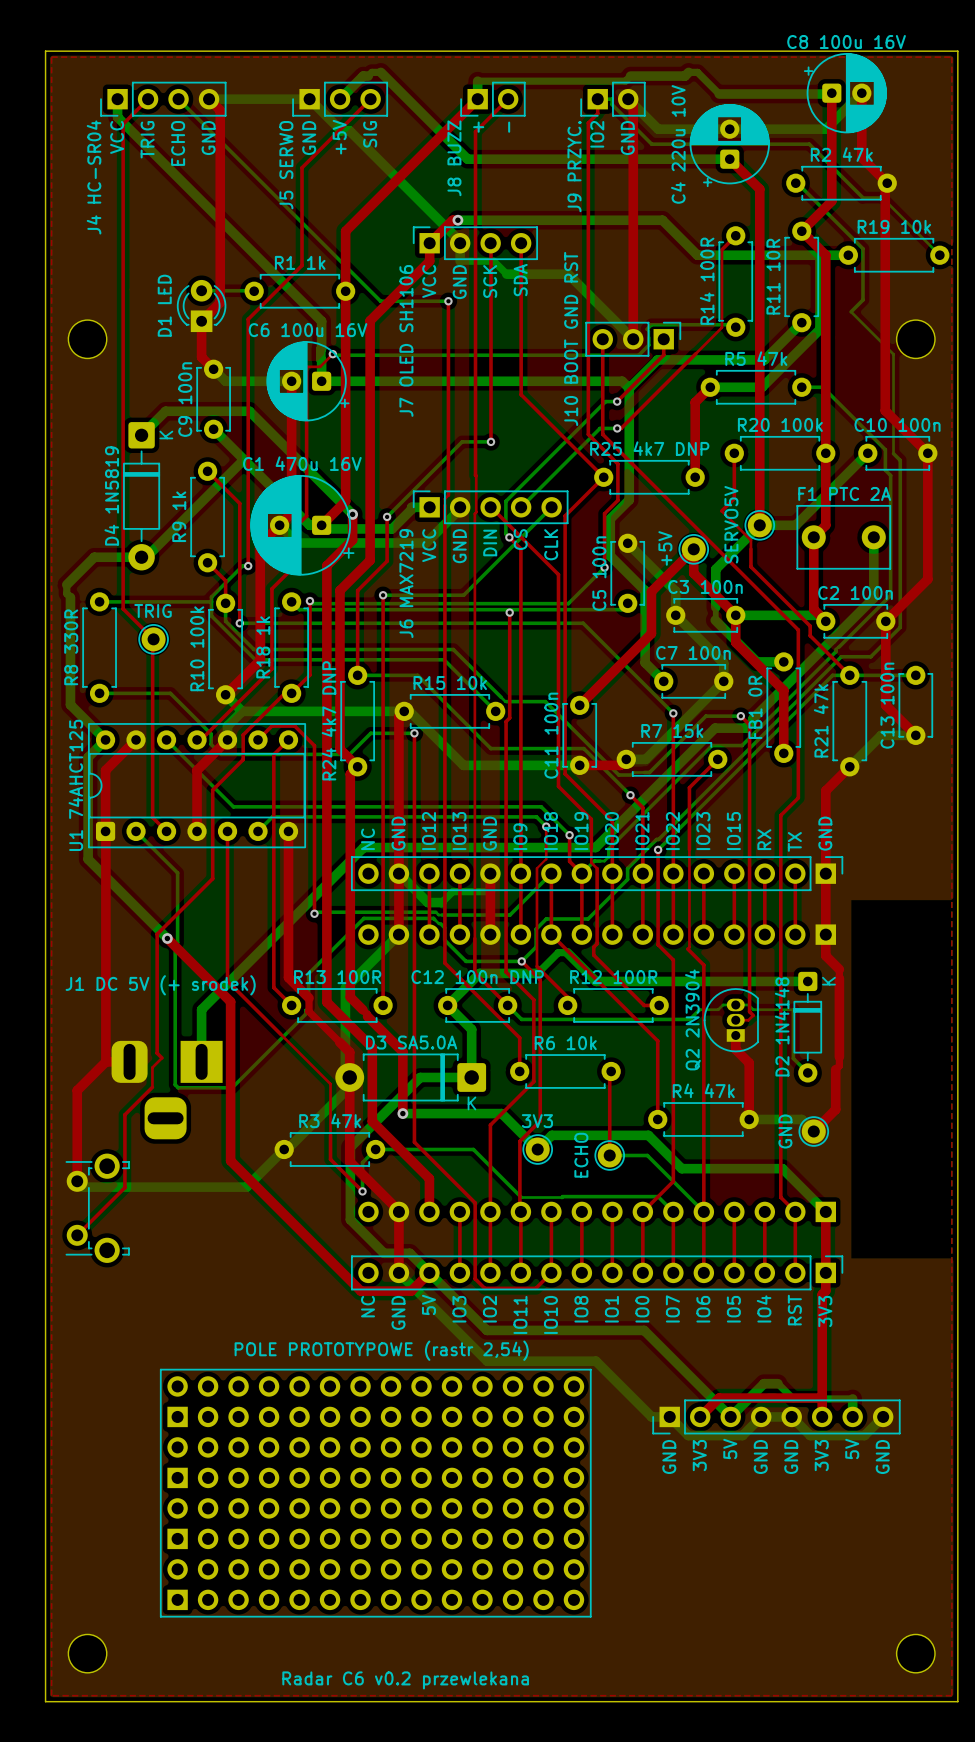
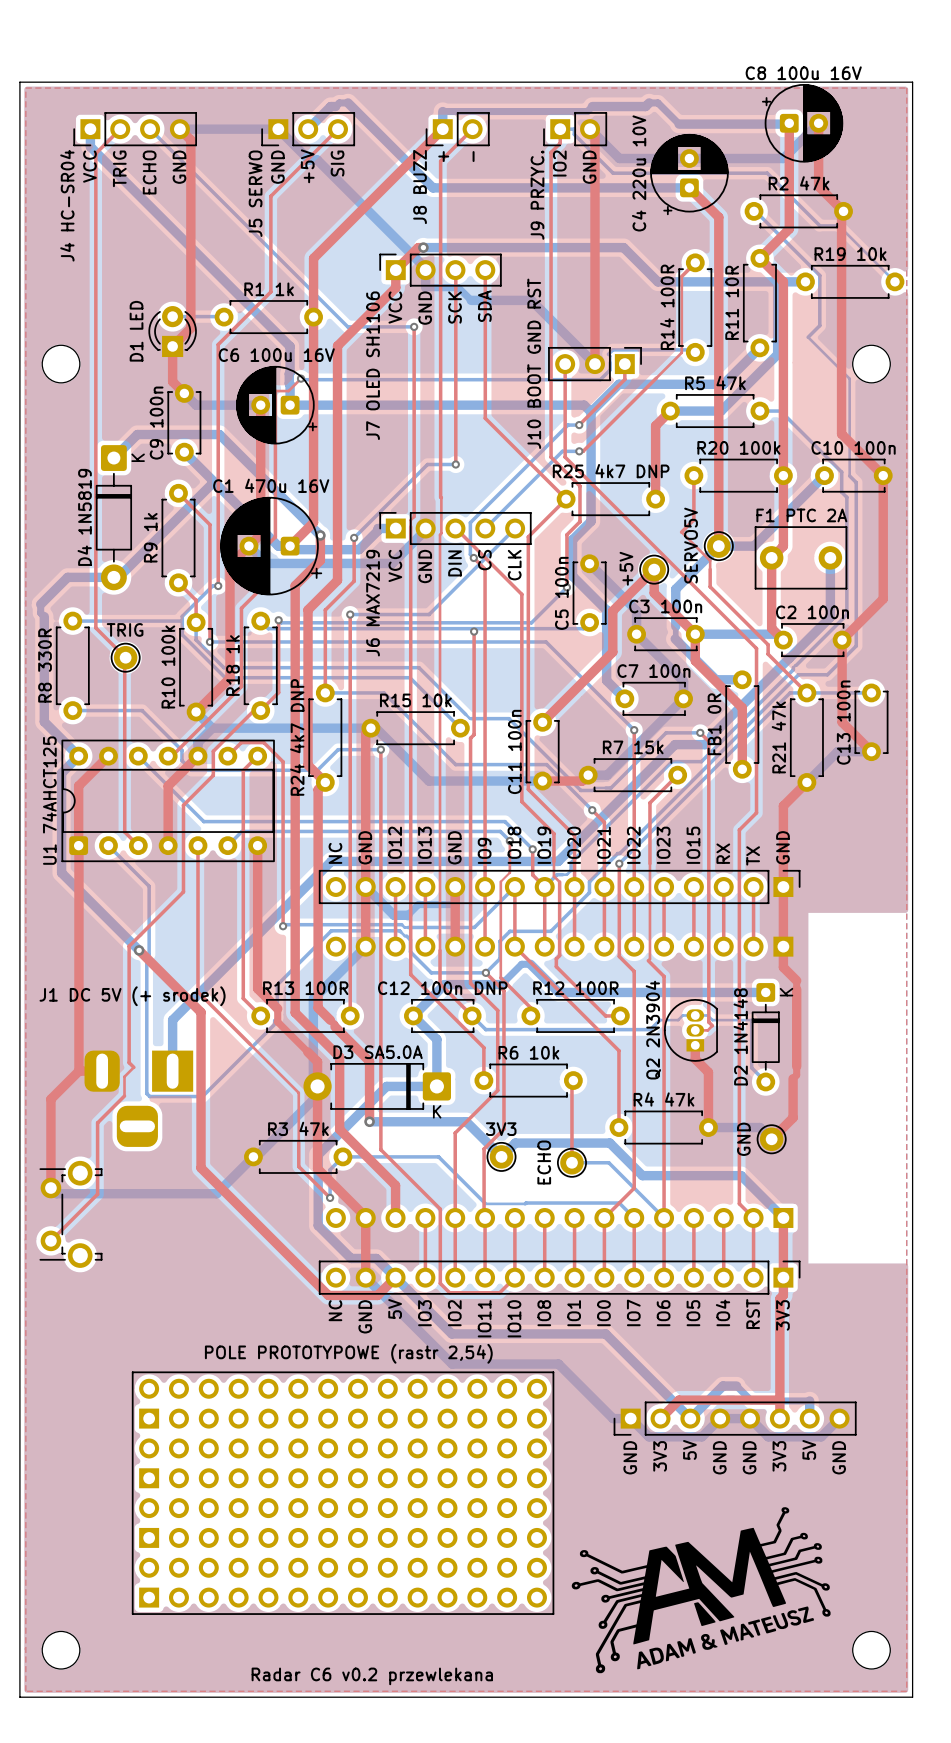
drawing: none -> [571, 1507, 831, 1674]

